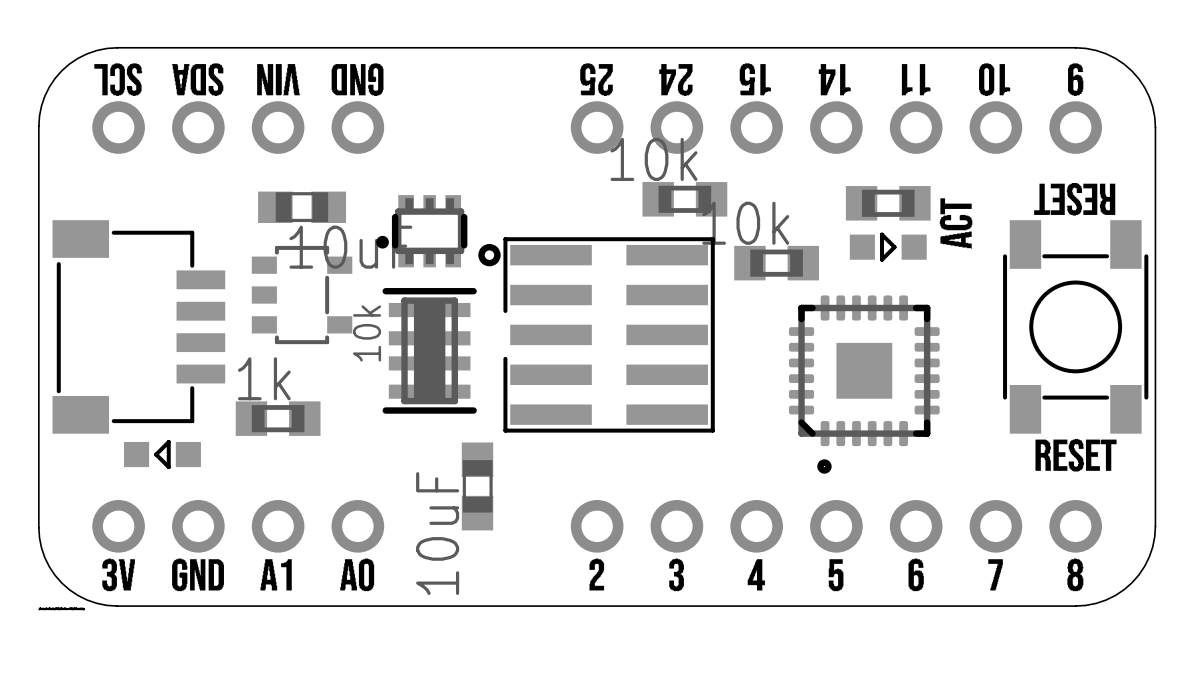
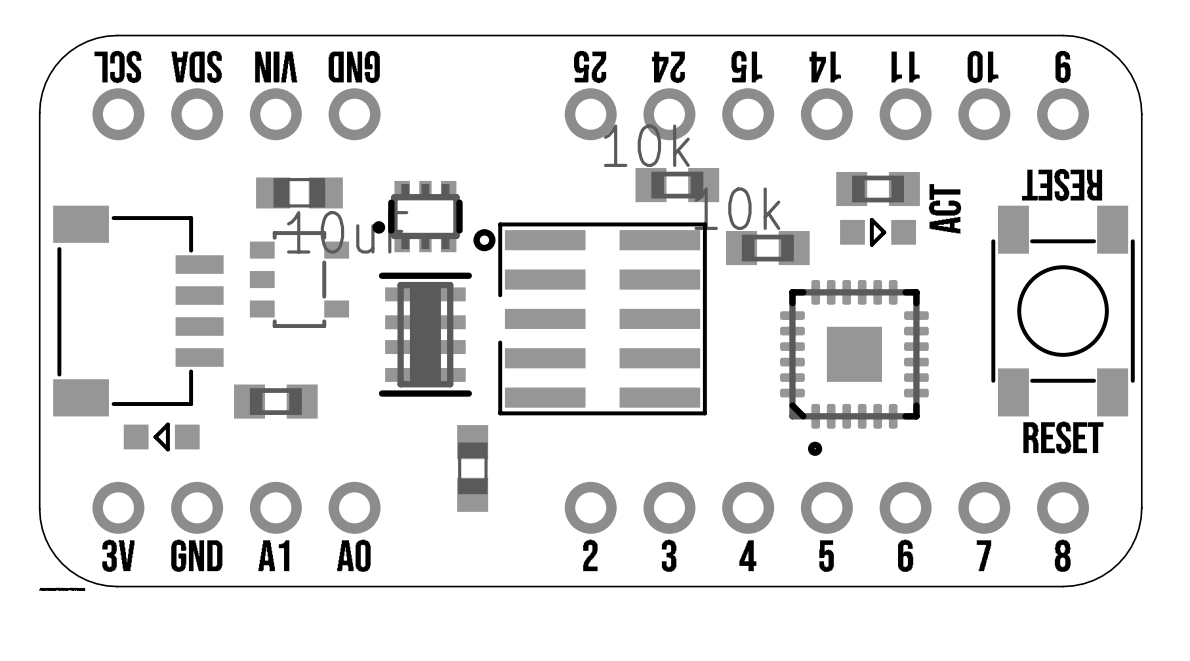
part value: 10k (367, 333) -> none
part value: 1k (264, 378) -> none
part value: 10uF (437, 533) -> none

